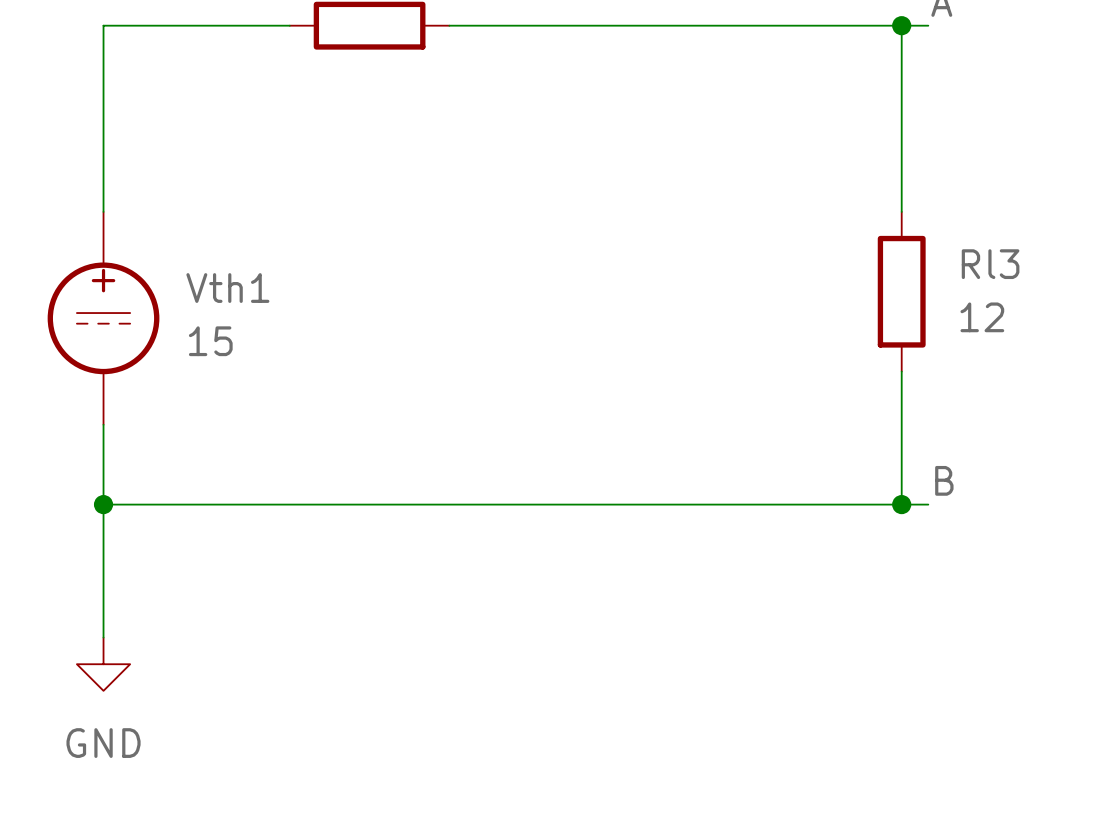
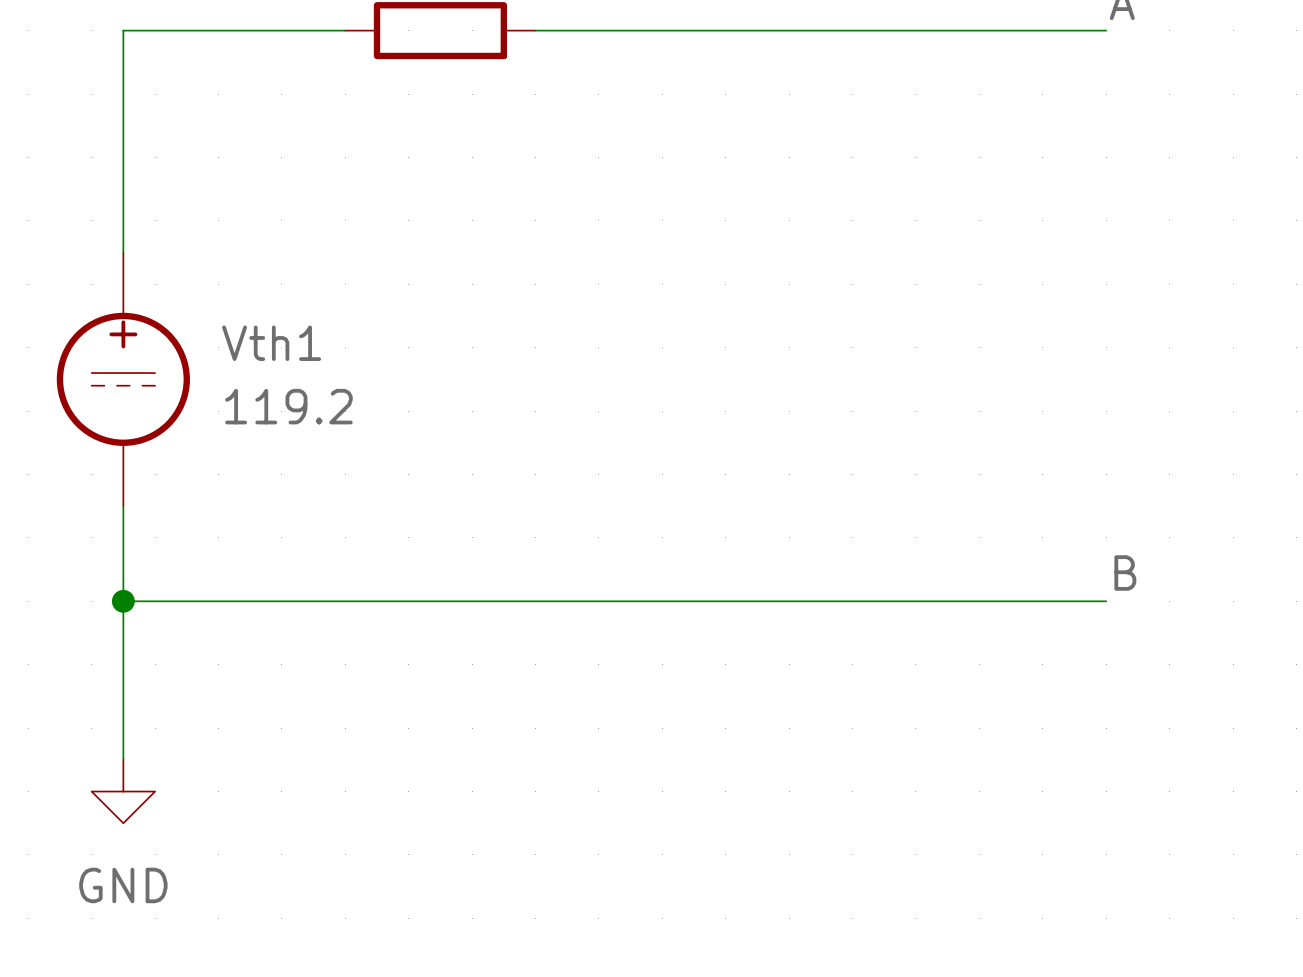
wire: (901, 25) (901, 211) -> none
junction: (901, 25) -> none
Rl3: 12 (901, 291) -> none
Vth1 value: 15 (210, 341) -> 119.2 (288, 406)
wire: (901, 371) (901, 504) -> none
junction: (901, 504) -> none

